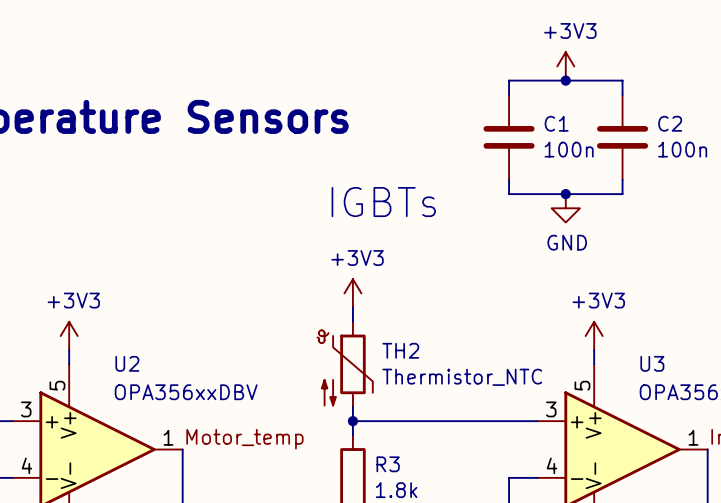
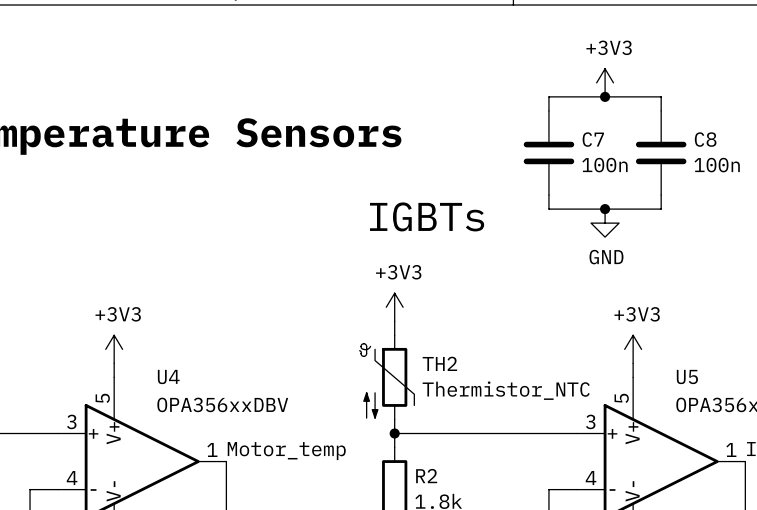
C1 name: C1 (556, 123) -> C7 (593, 139)
C2 name: C2 (670, 123) -> C8 (705, 139)
U2 name: U2 (127, 363) -> U4 (168, 377)
U3 name: U3 (652, 363) -> U5 (687, 377)
R3 name: R3 (388, 464) -> R2 (426, 476)

